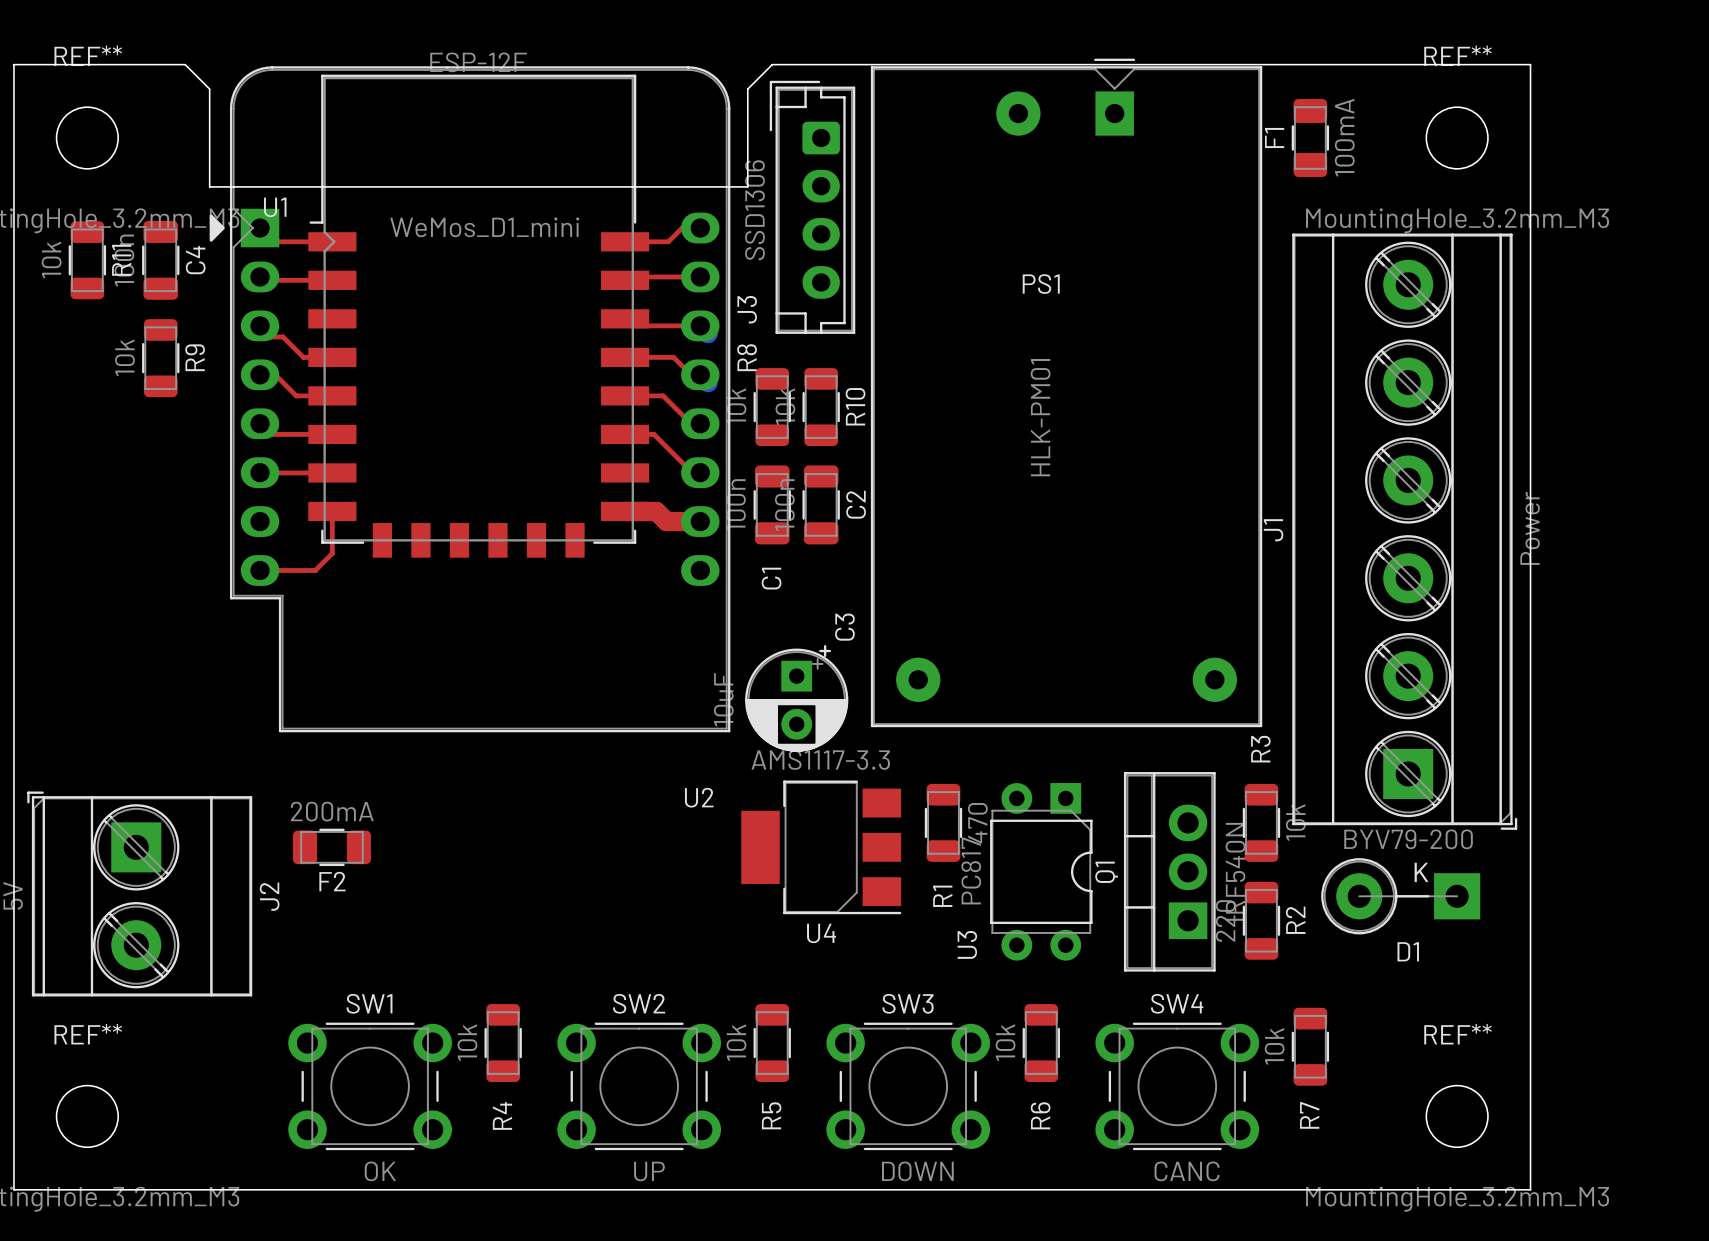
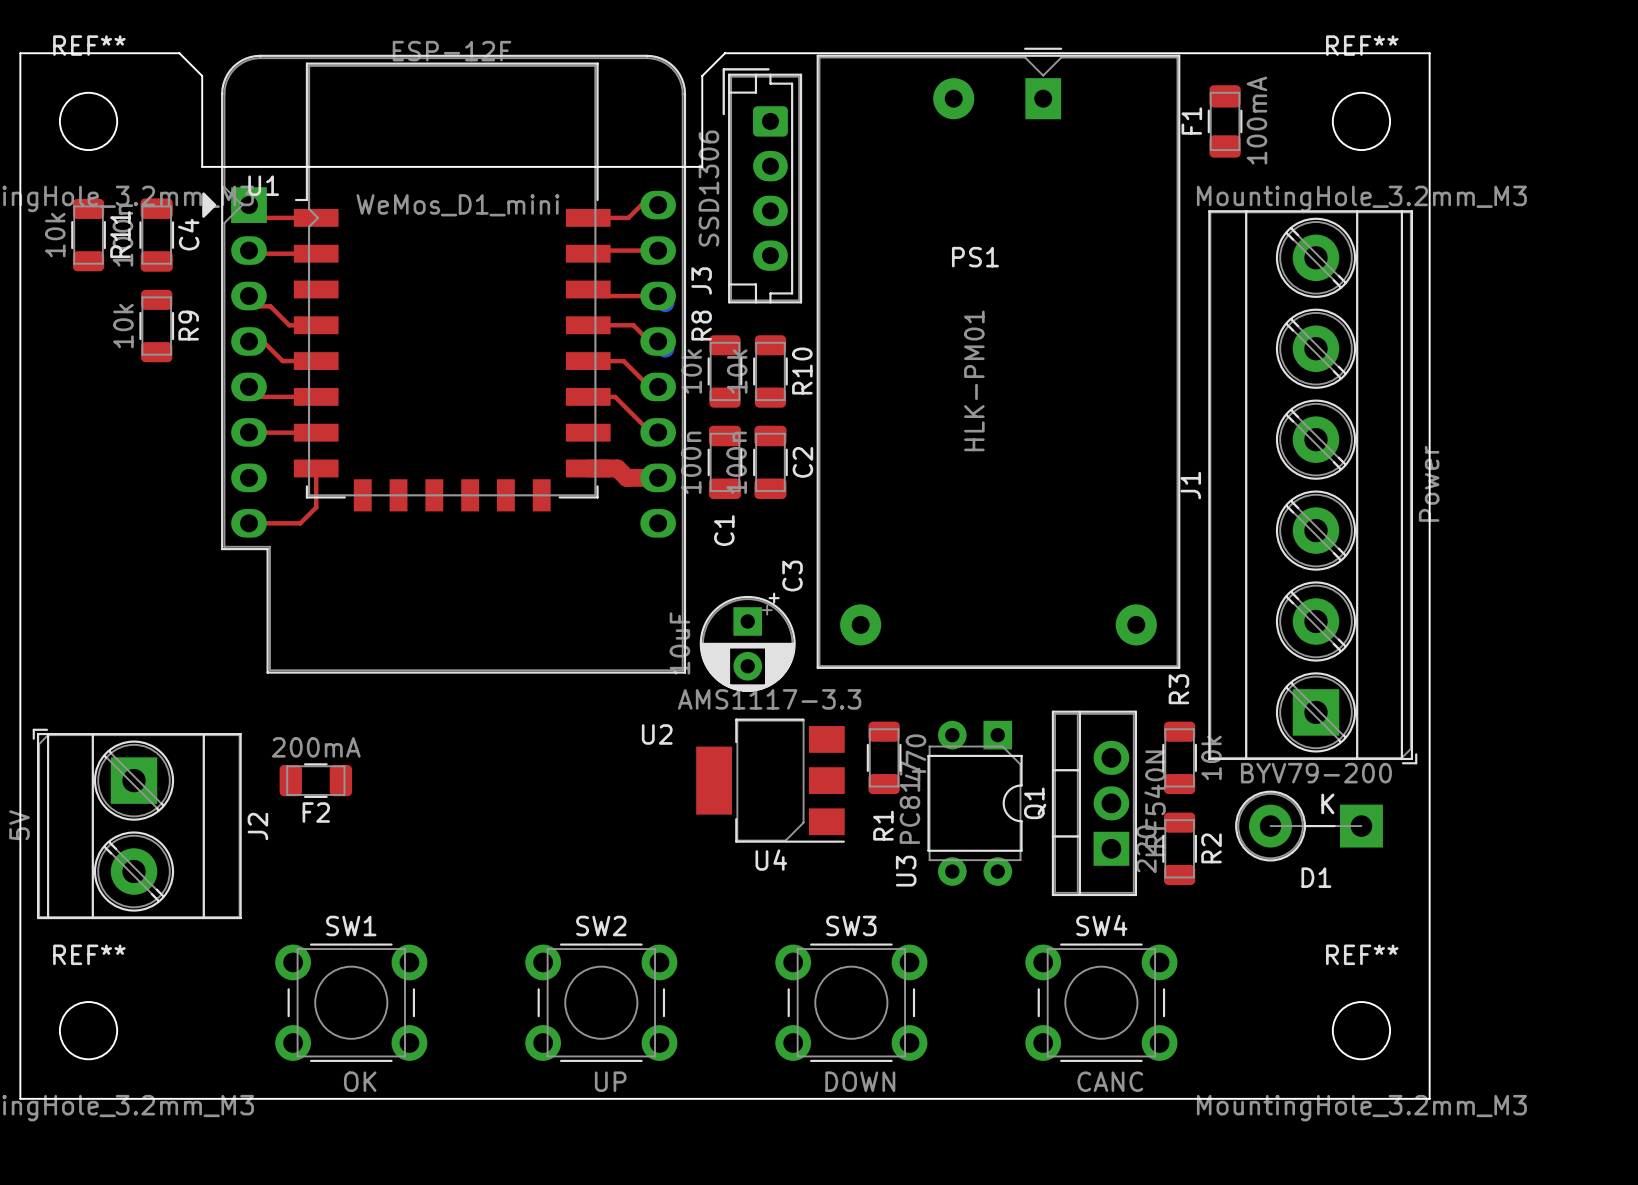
R4: 10k (503, 1043) -> none
R5: 10k (772, 1043) -> none
R6: 10k (1041, 1043) -> none
R7: 10k (1310, 1046) -> none

